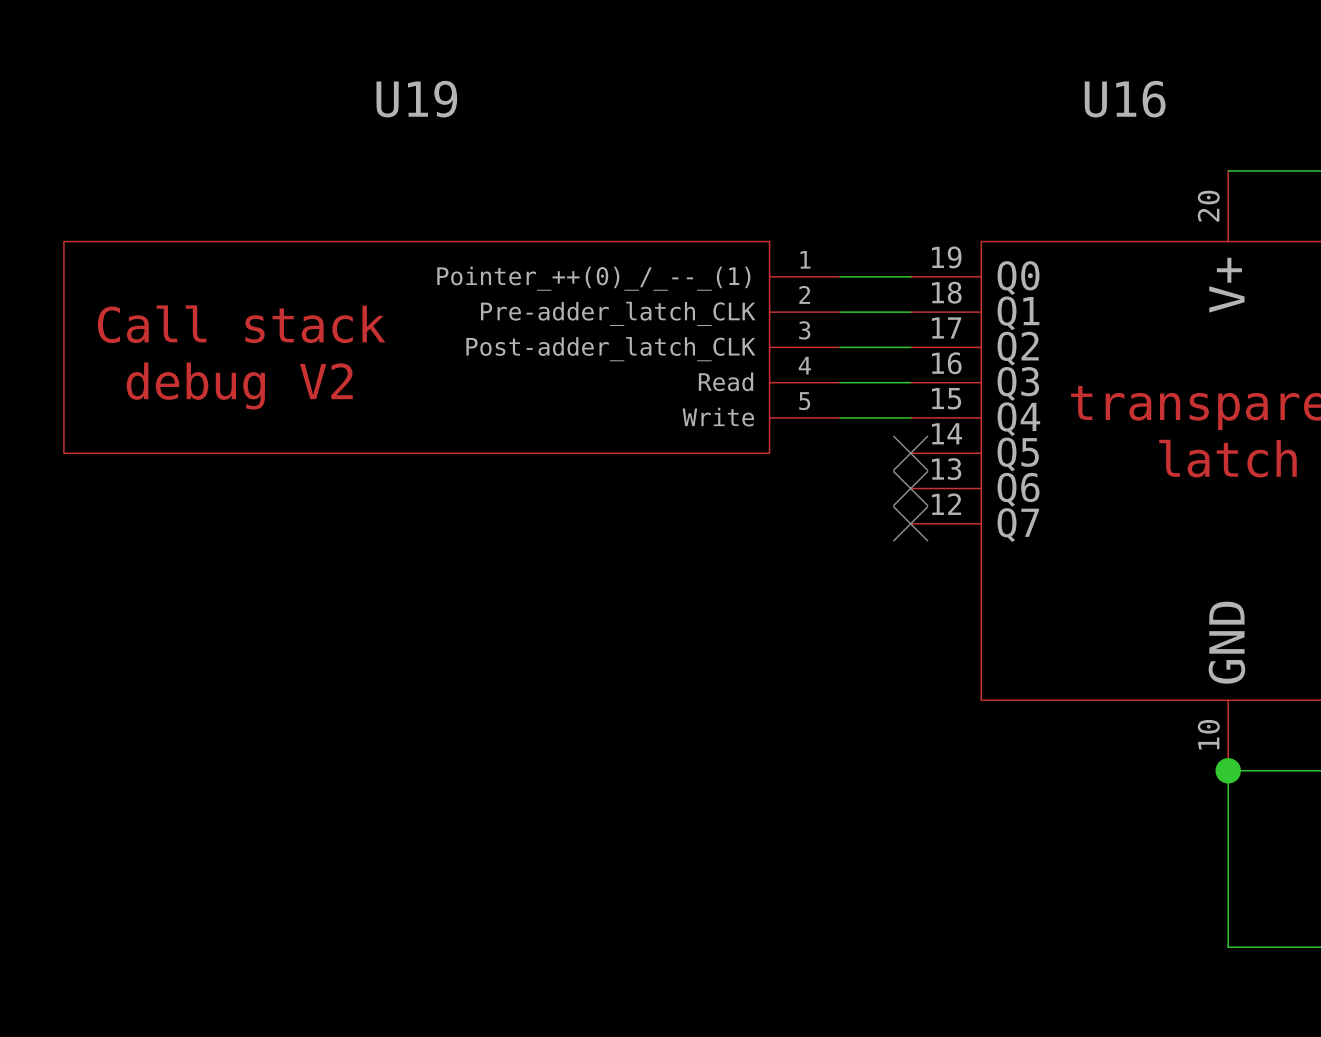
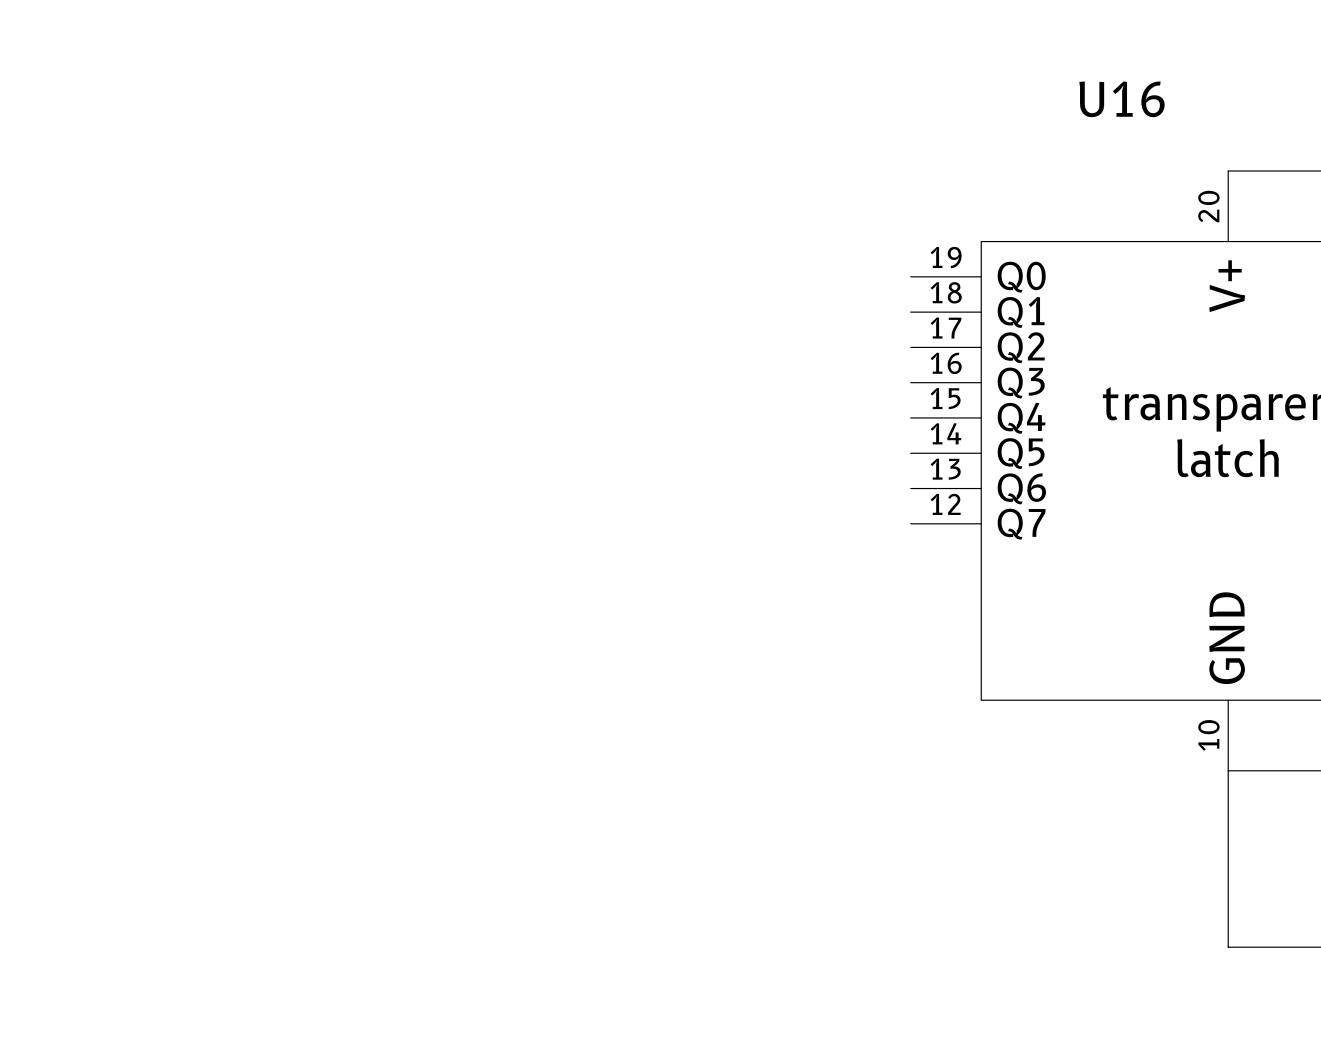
wire: (840, 276) (910, 276) -> none
wire: (840, 312) (910, 312) -> none
U19: (452, 347) -> none
wire: (840, 347) (910, 347) -> none
wire: (840, 382) (910, 382) -> none
wire: (840, 417) (910, 417) -> none
no-connect mark: (910, 453) -> none
no-connect mark: (910, 488) -> none
no-connect mark: (910, 523) -> none
junction: (1228, 770) -> none

